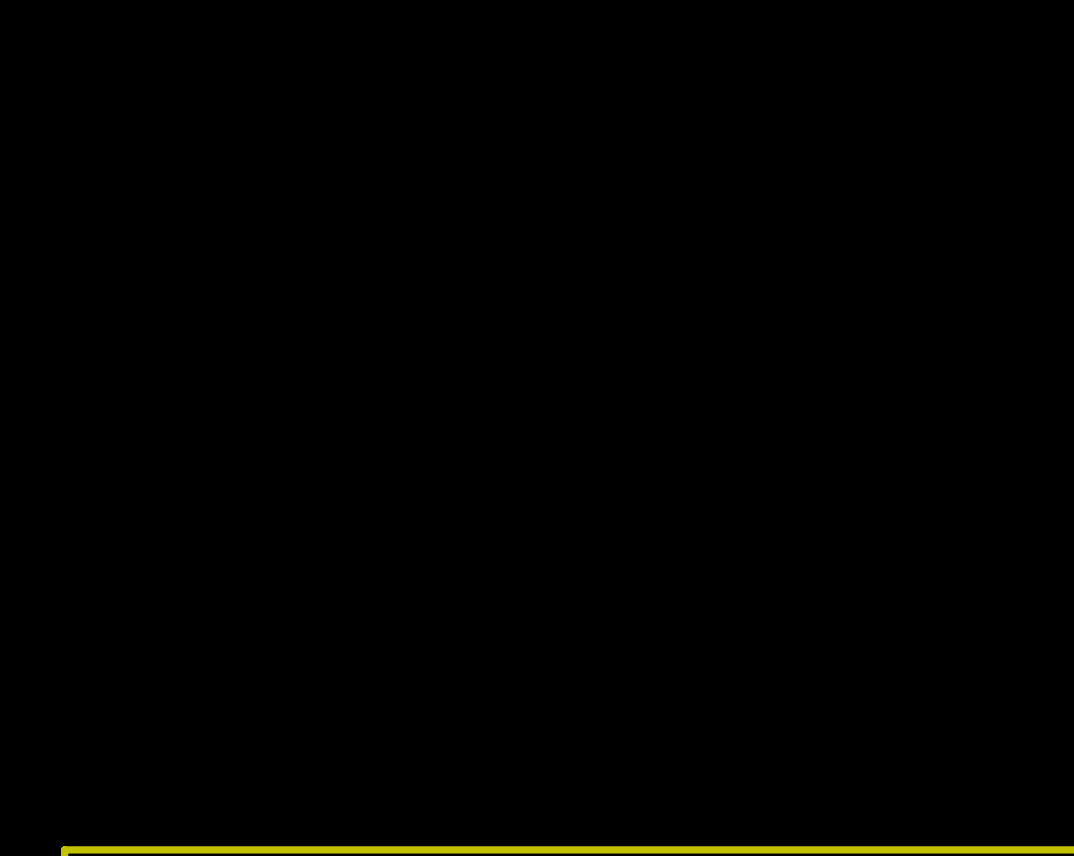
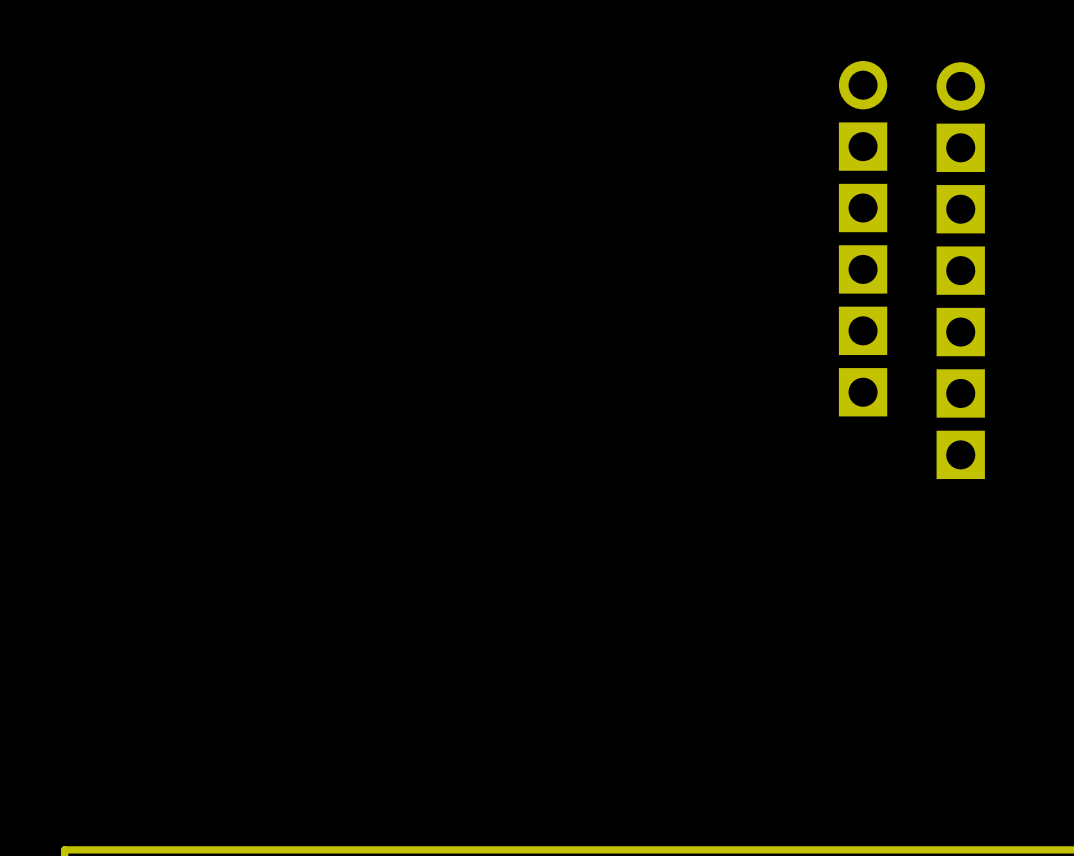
part: none -> (863, 238)
part: none -> (960, 270)

